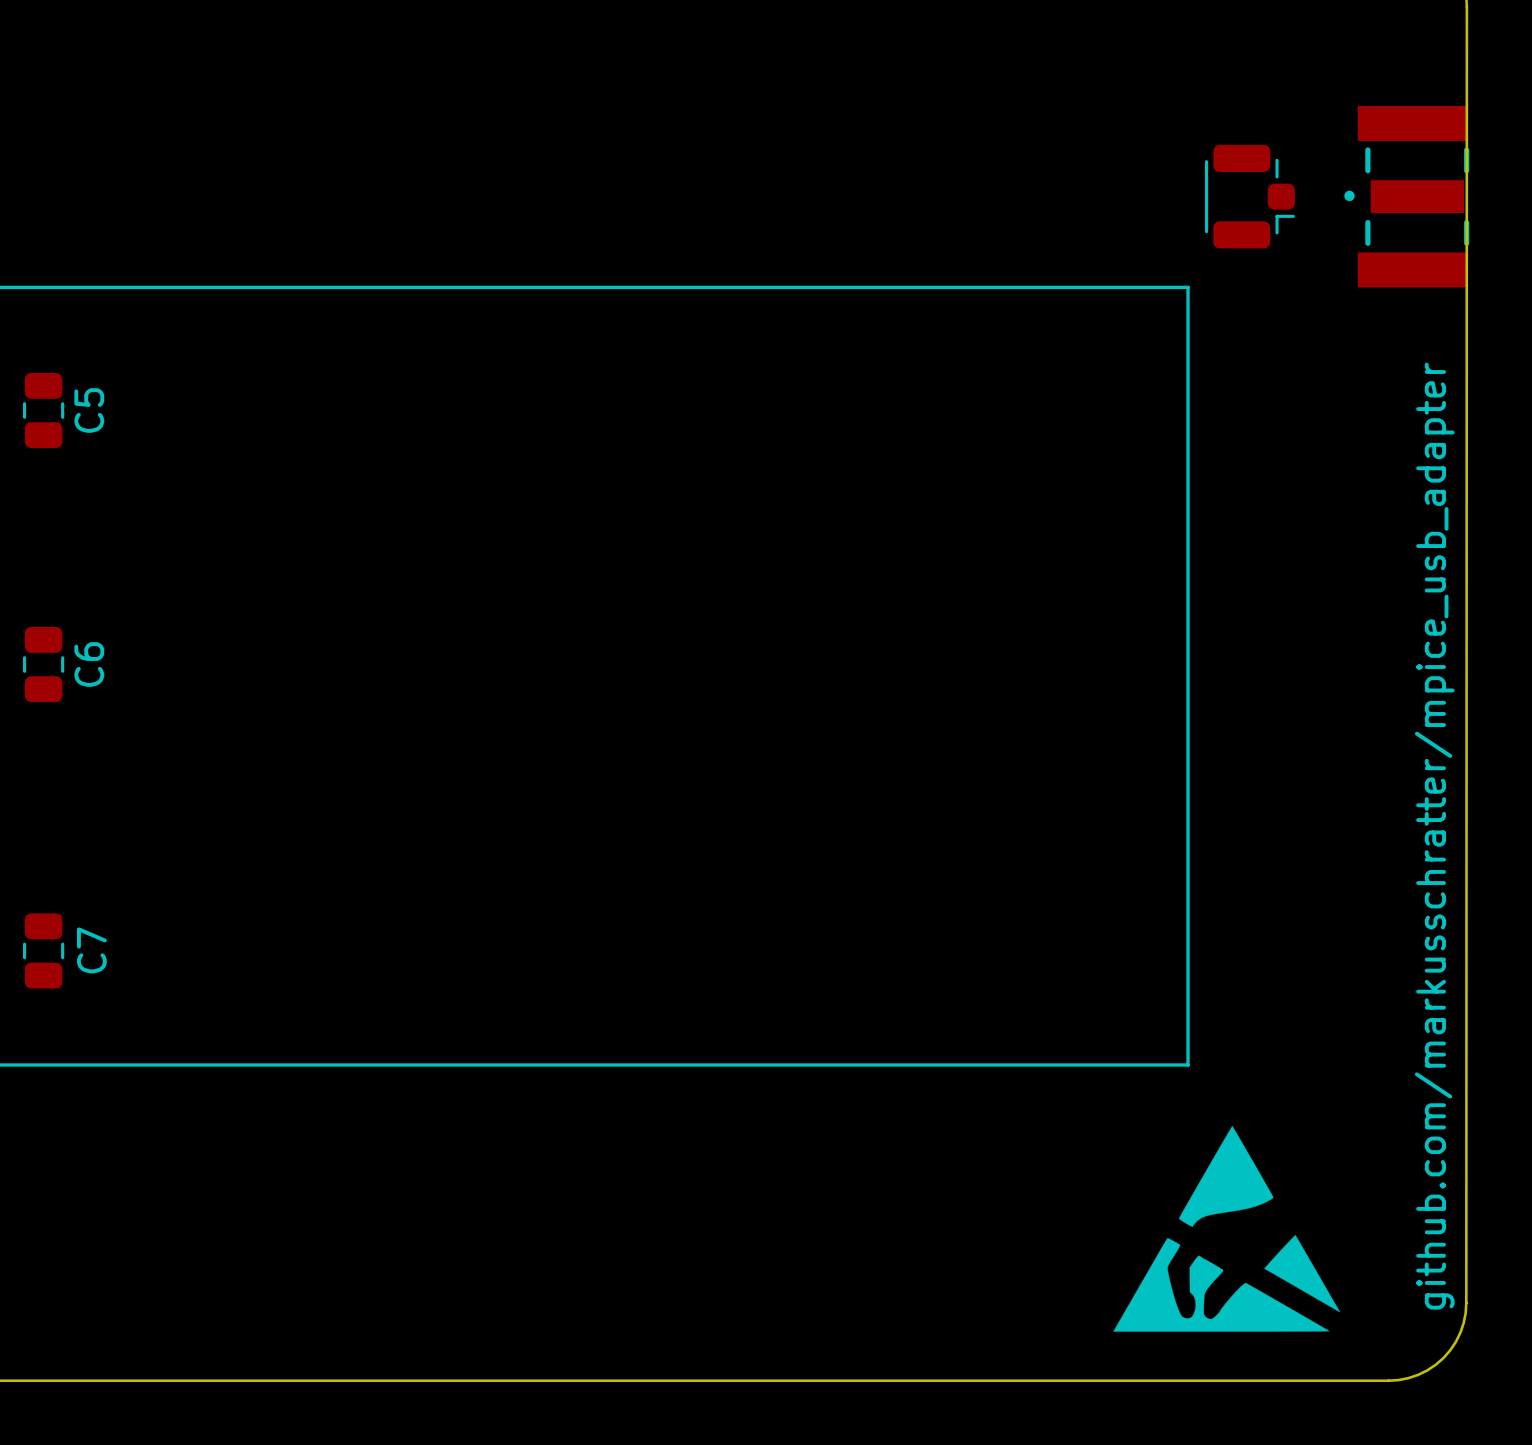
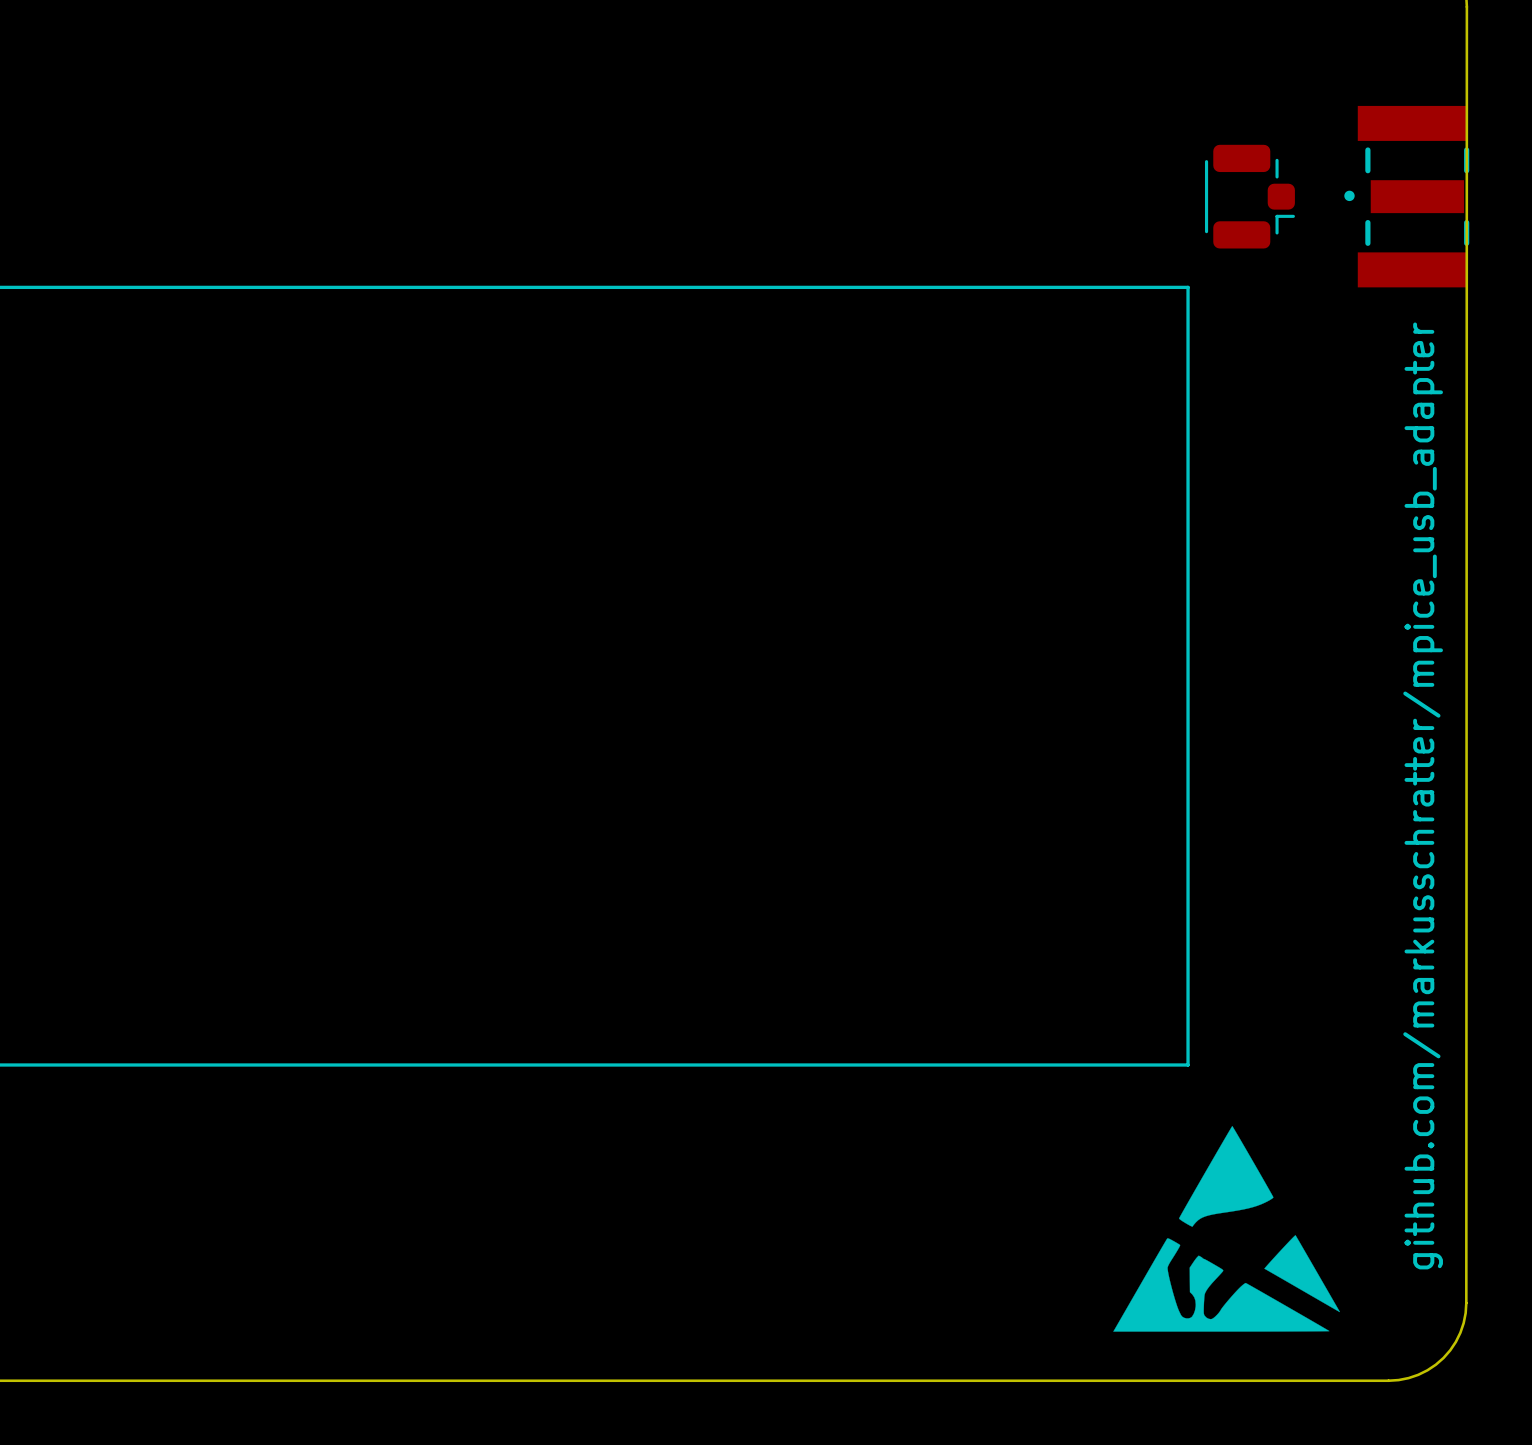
C5: (43, 410) -> none
C6: (43, 664) -> none
text position: github.com/markusschratter/mpice_usb_adapter (1434, 836) -> github.com/markusschratter/mpice_usb_adapter (1423, 795)
C7: (43, 950) -> none

